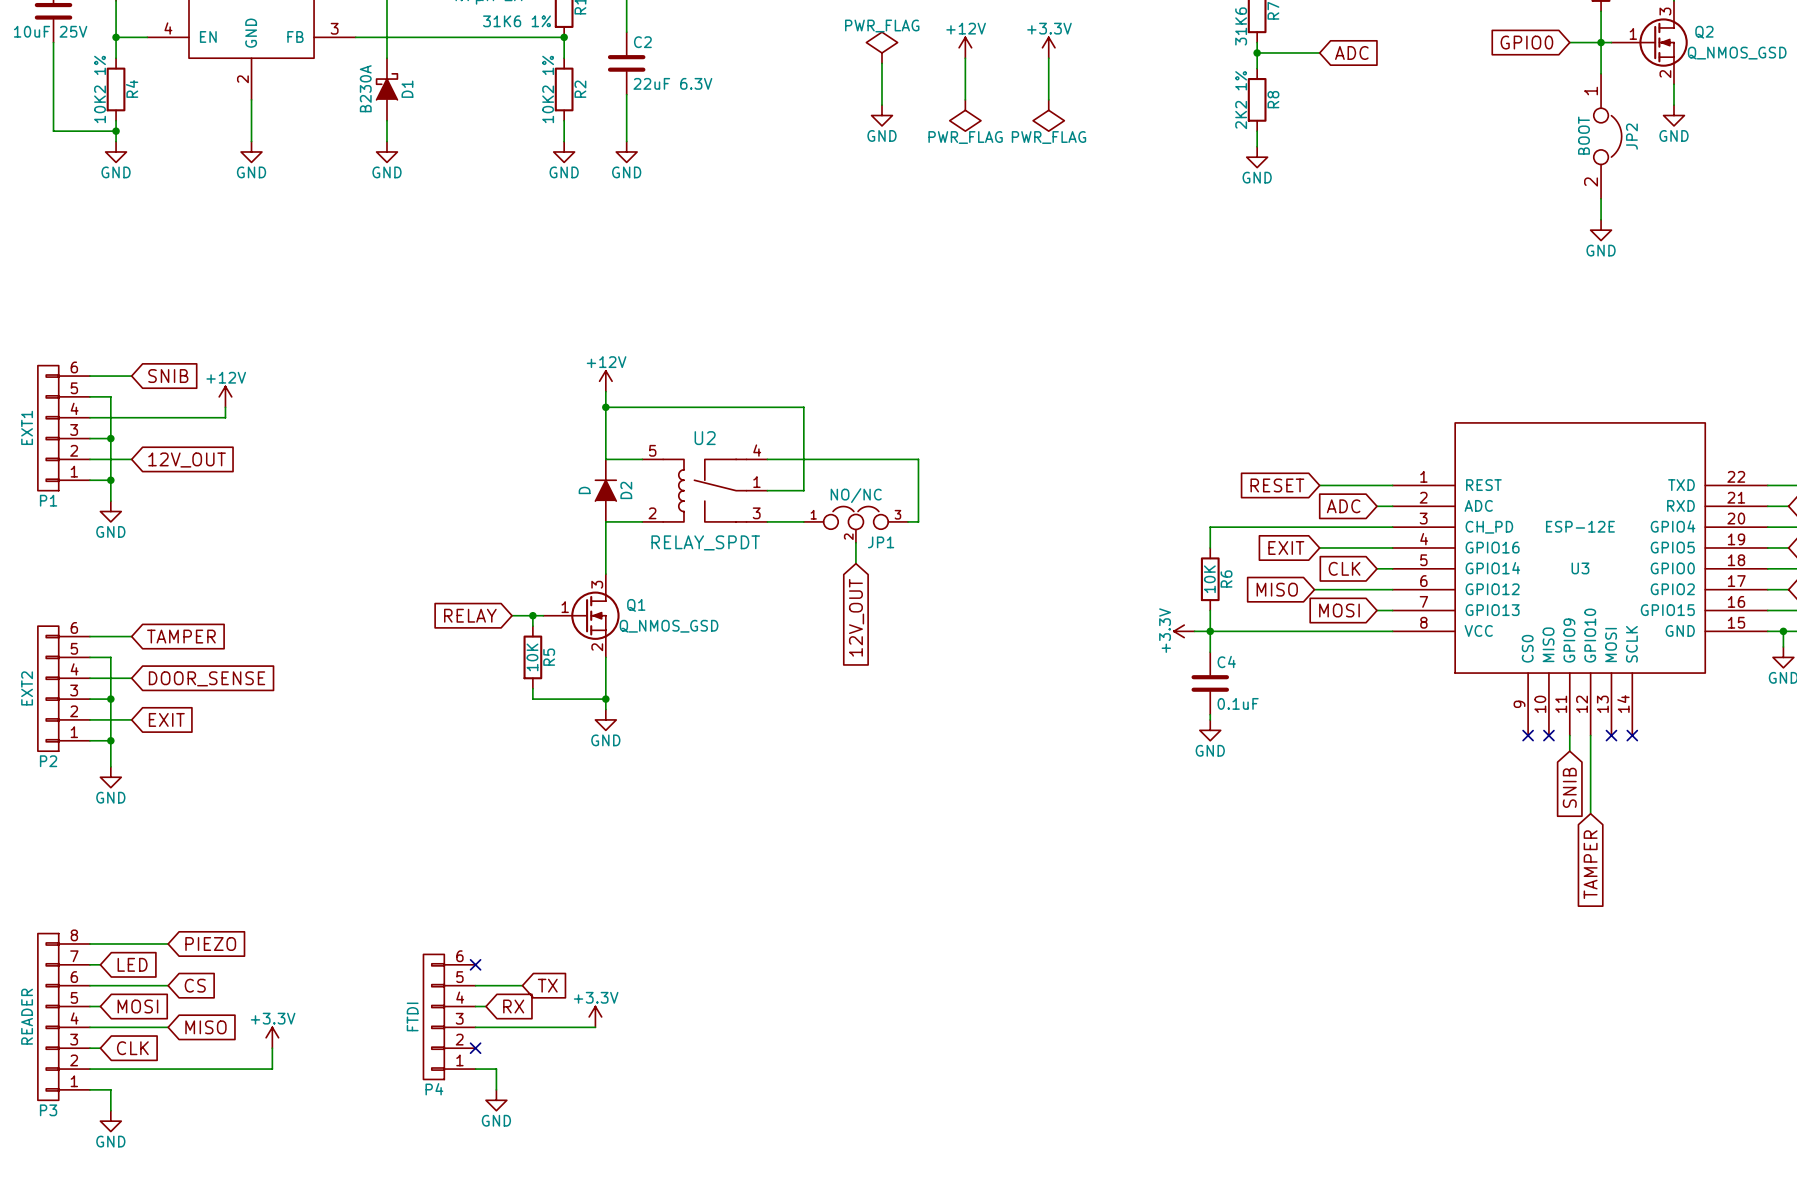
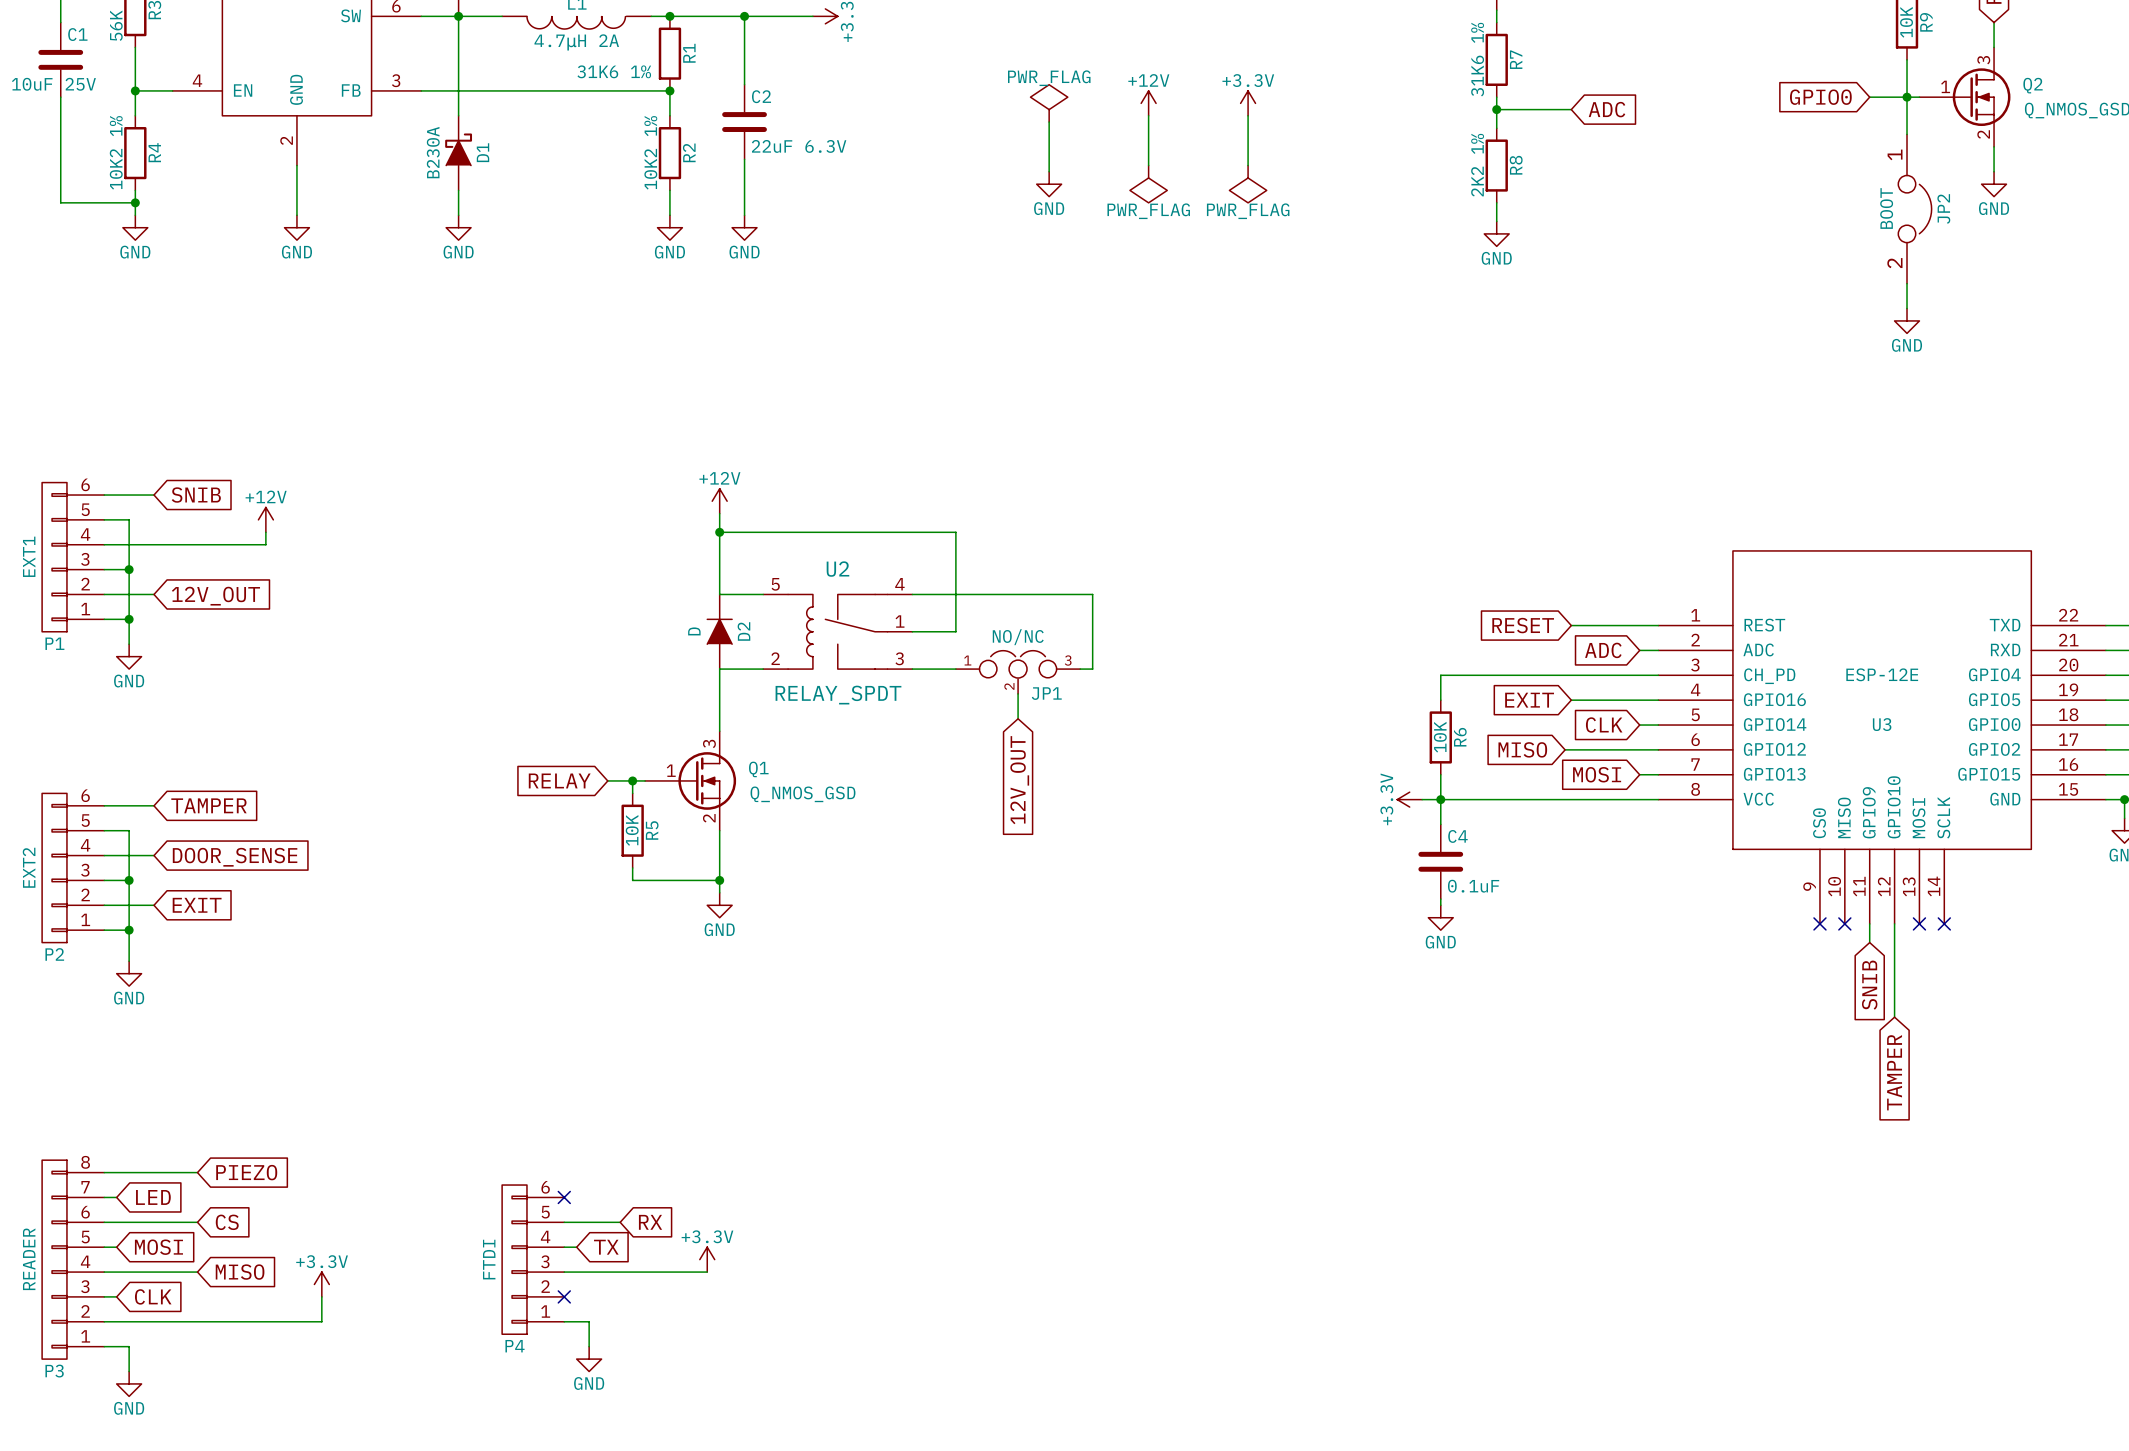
global label: TX (547, 985) -> RX (650, 1222)
global label: RX (513, 1006) -> TX (606, 1247)

